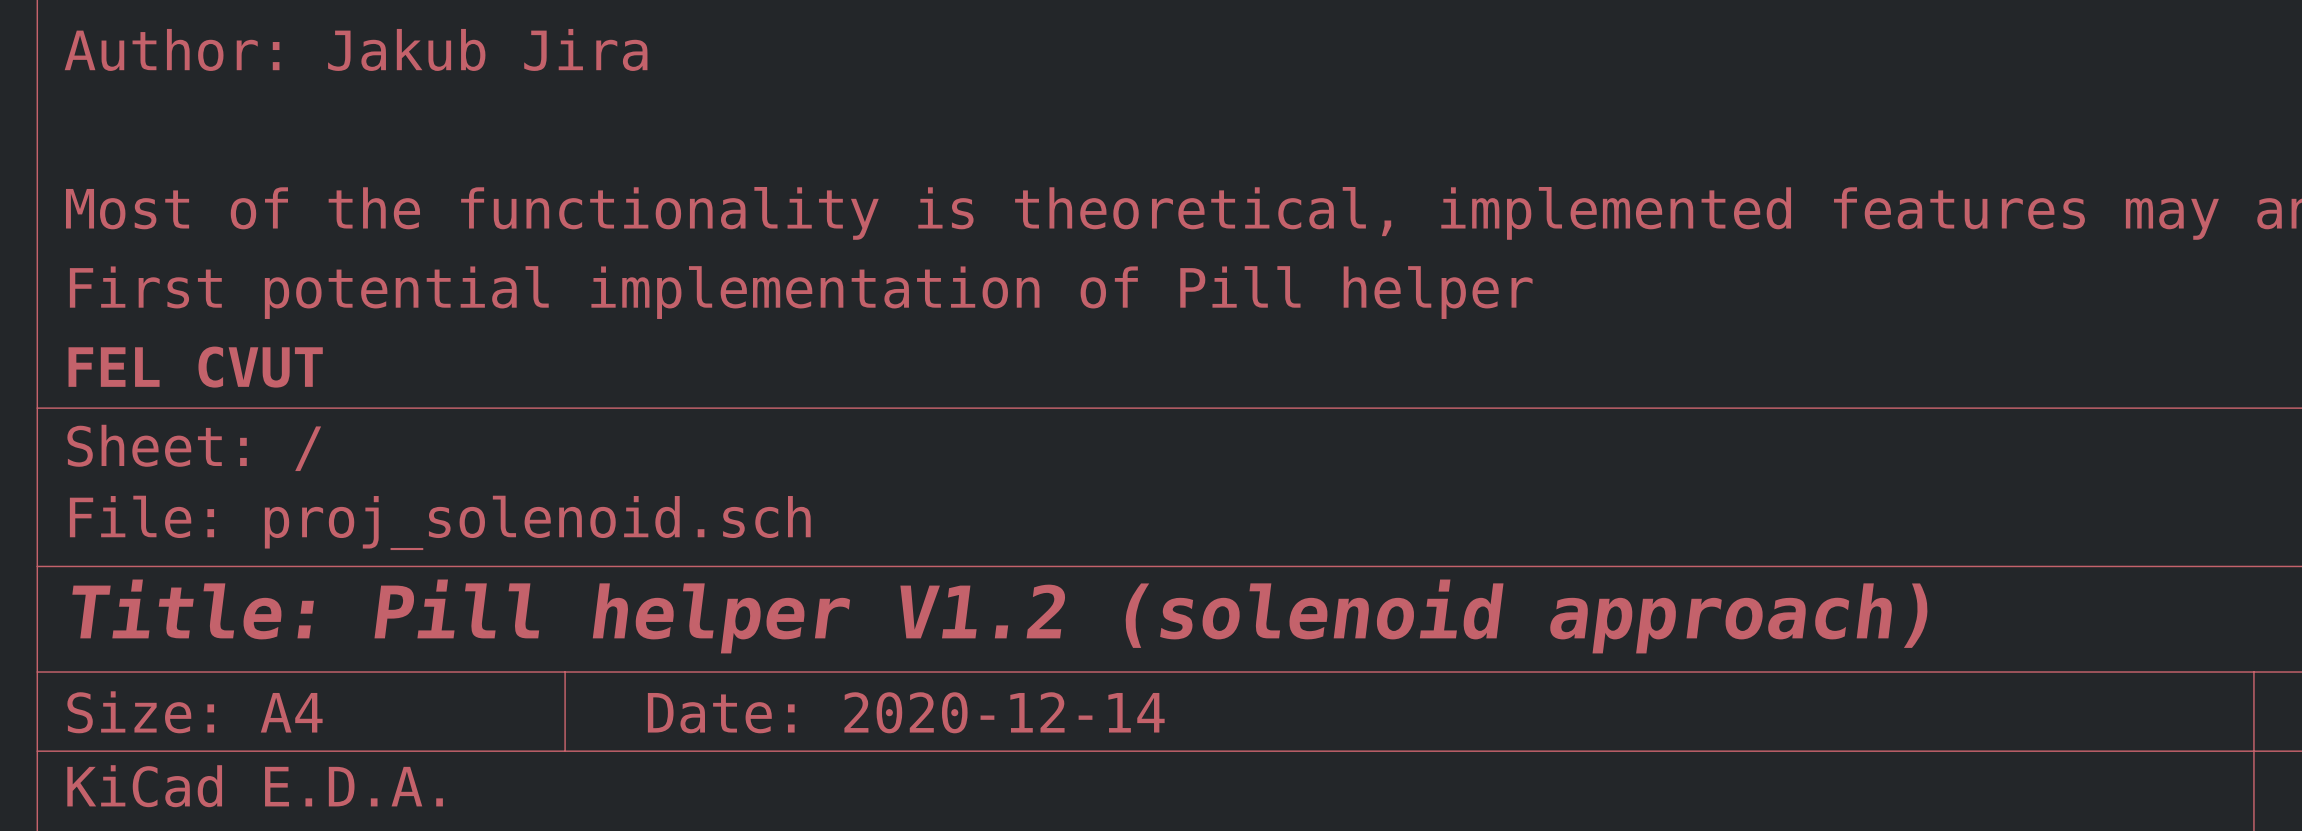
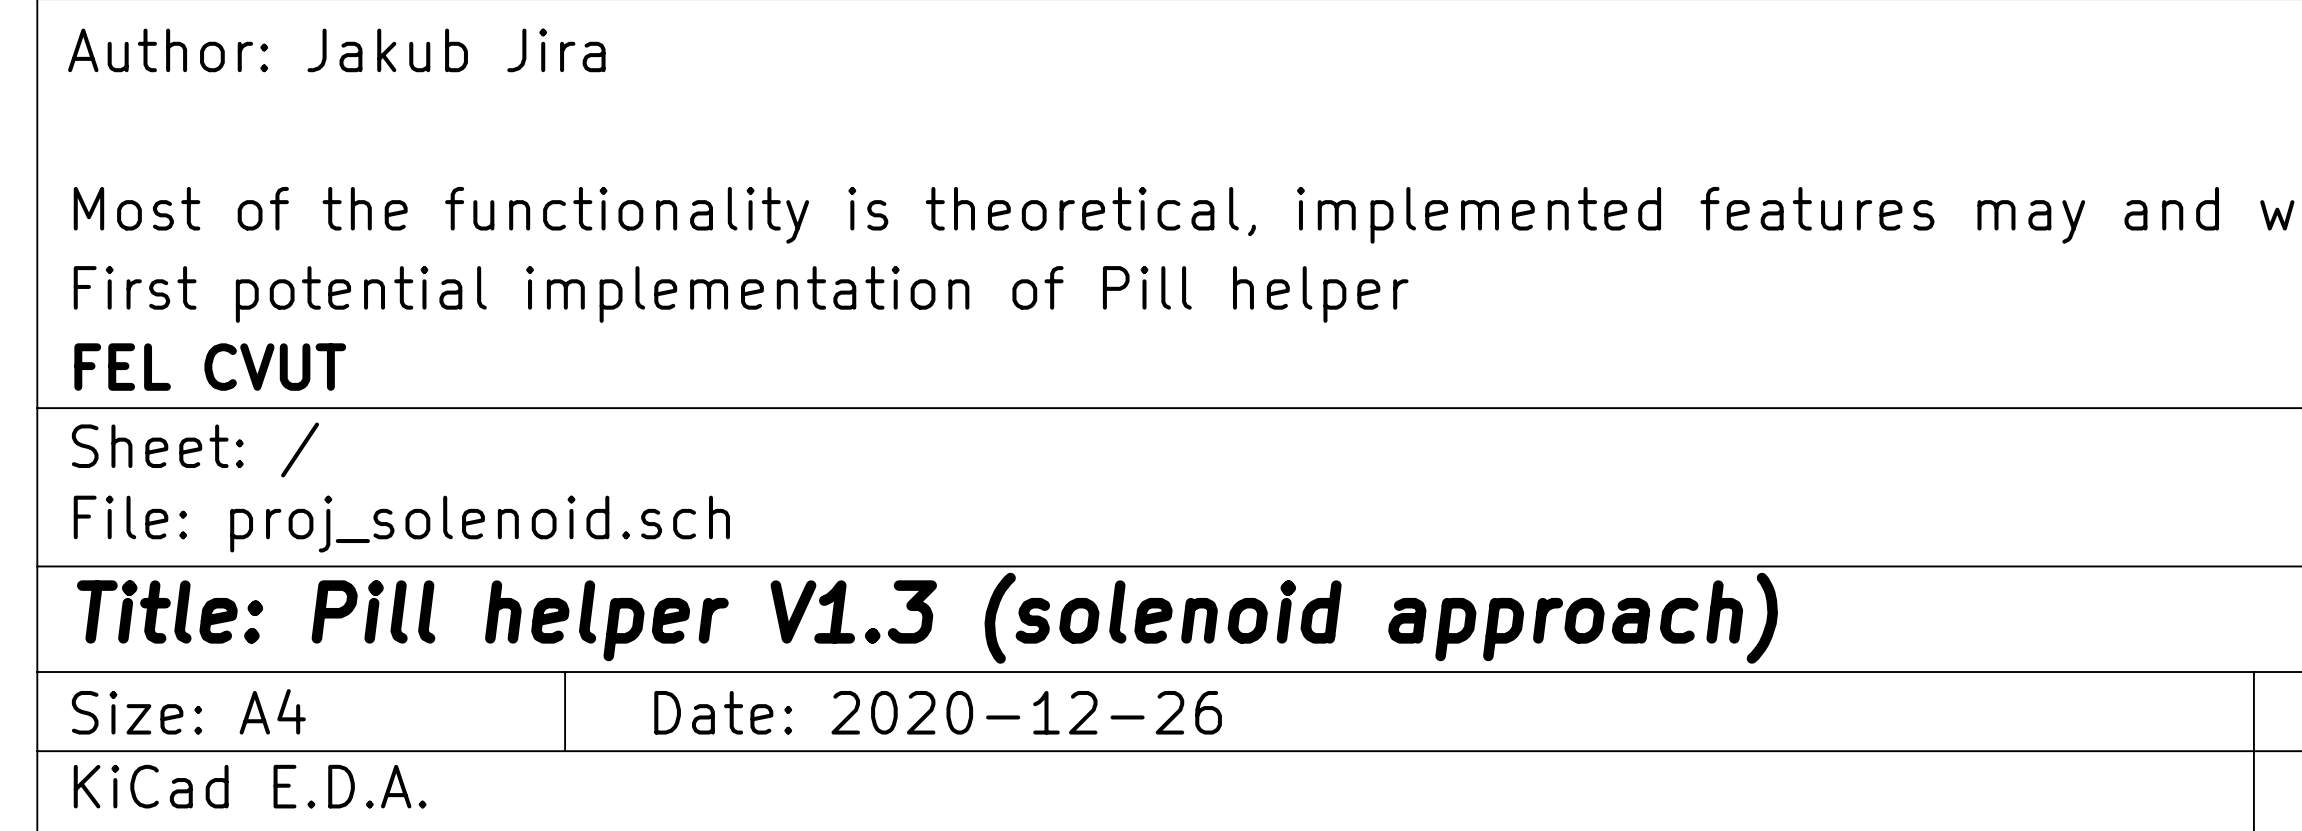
title block: Title: Pill helper V1.2 (solenoid approach) (1000, 616) -> Title: Pill helper V1.3 (solenoid approach) (927, 618)
title block: Date: 2020-12-14 (906, 712) -> Date: 2020-12-26 (938, 712)

